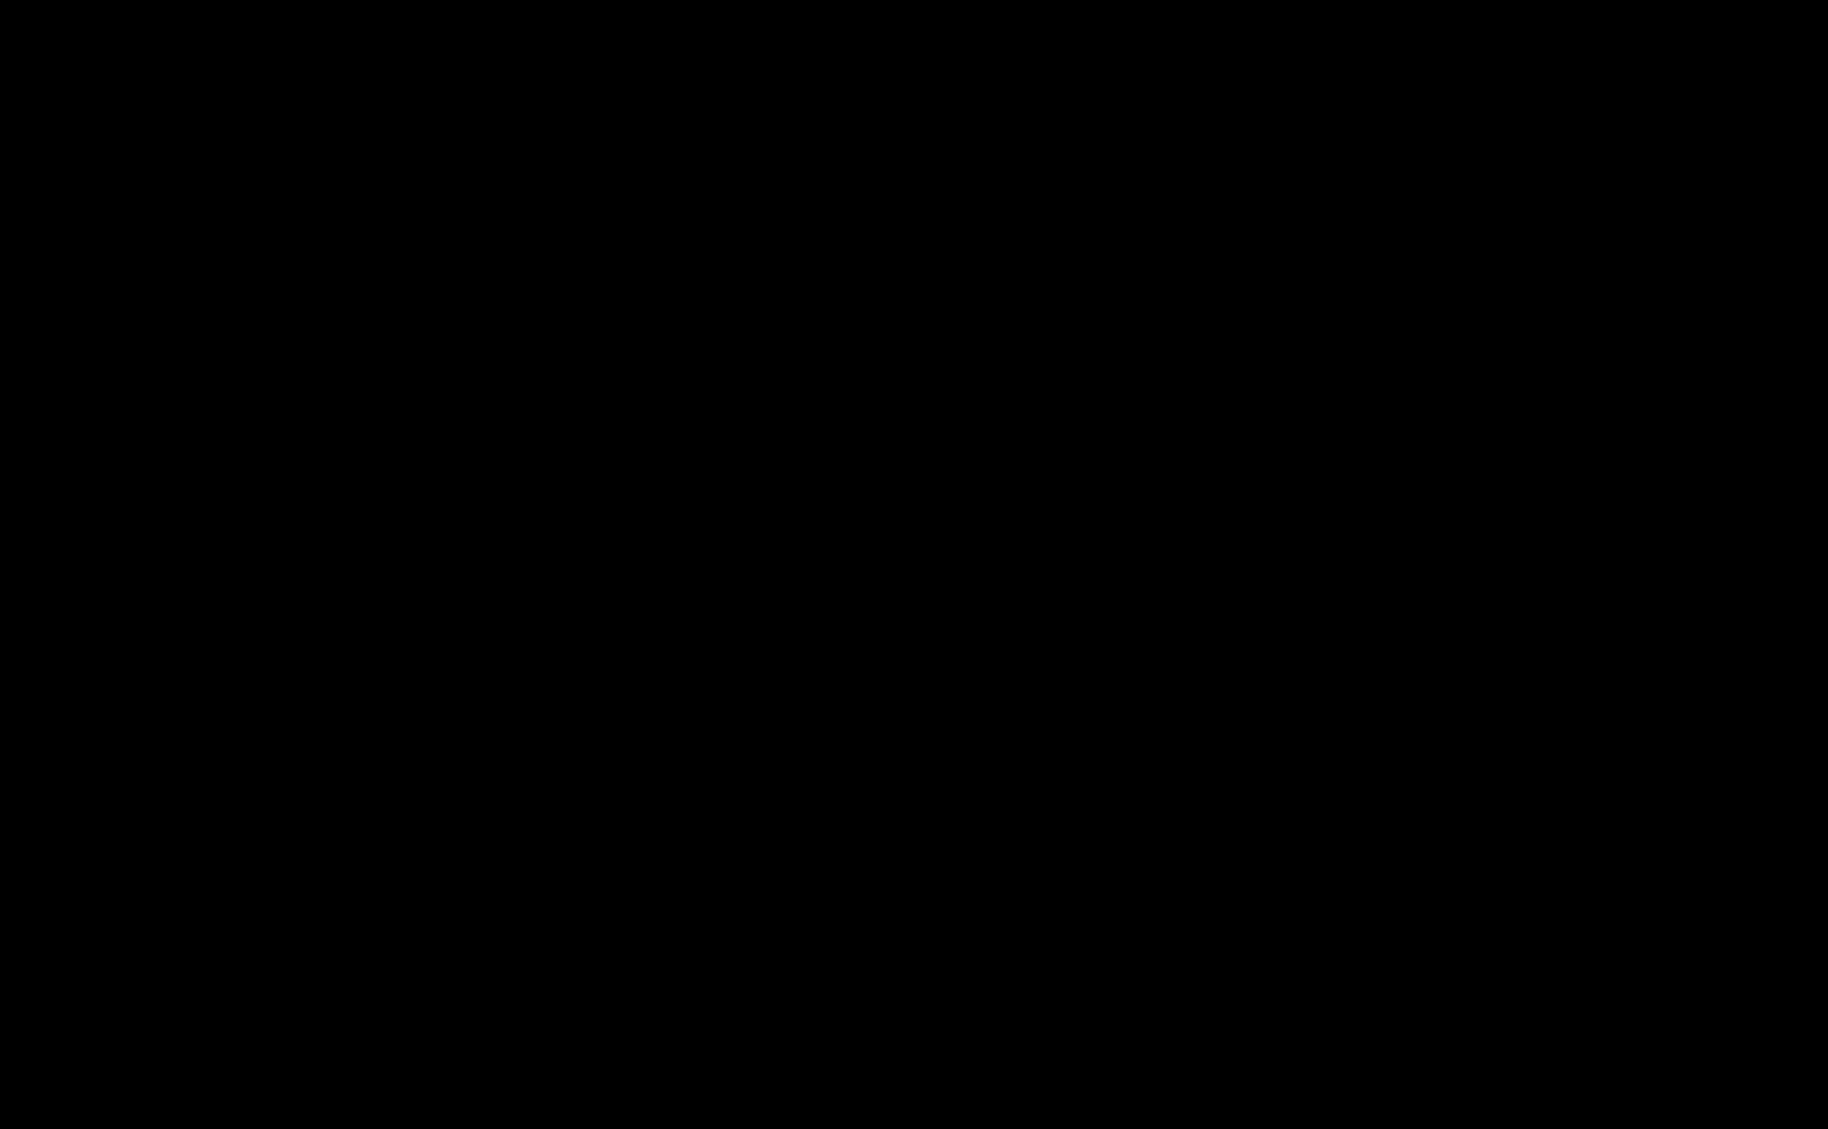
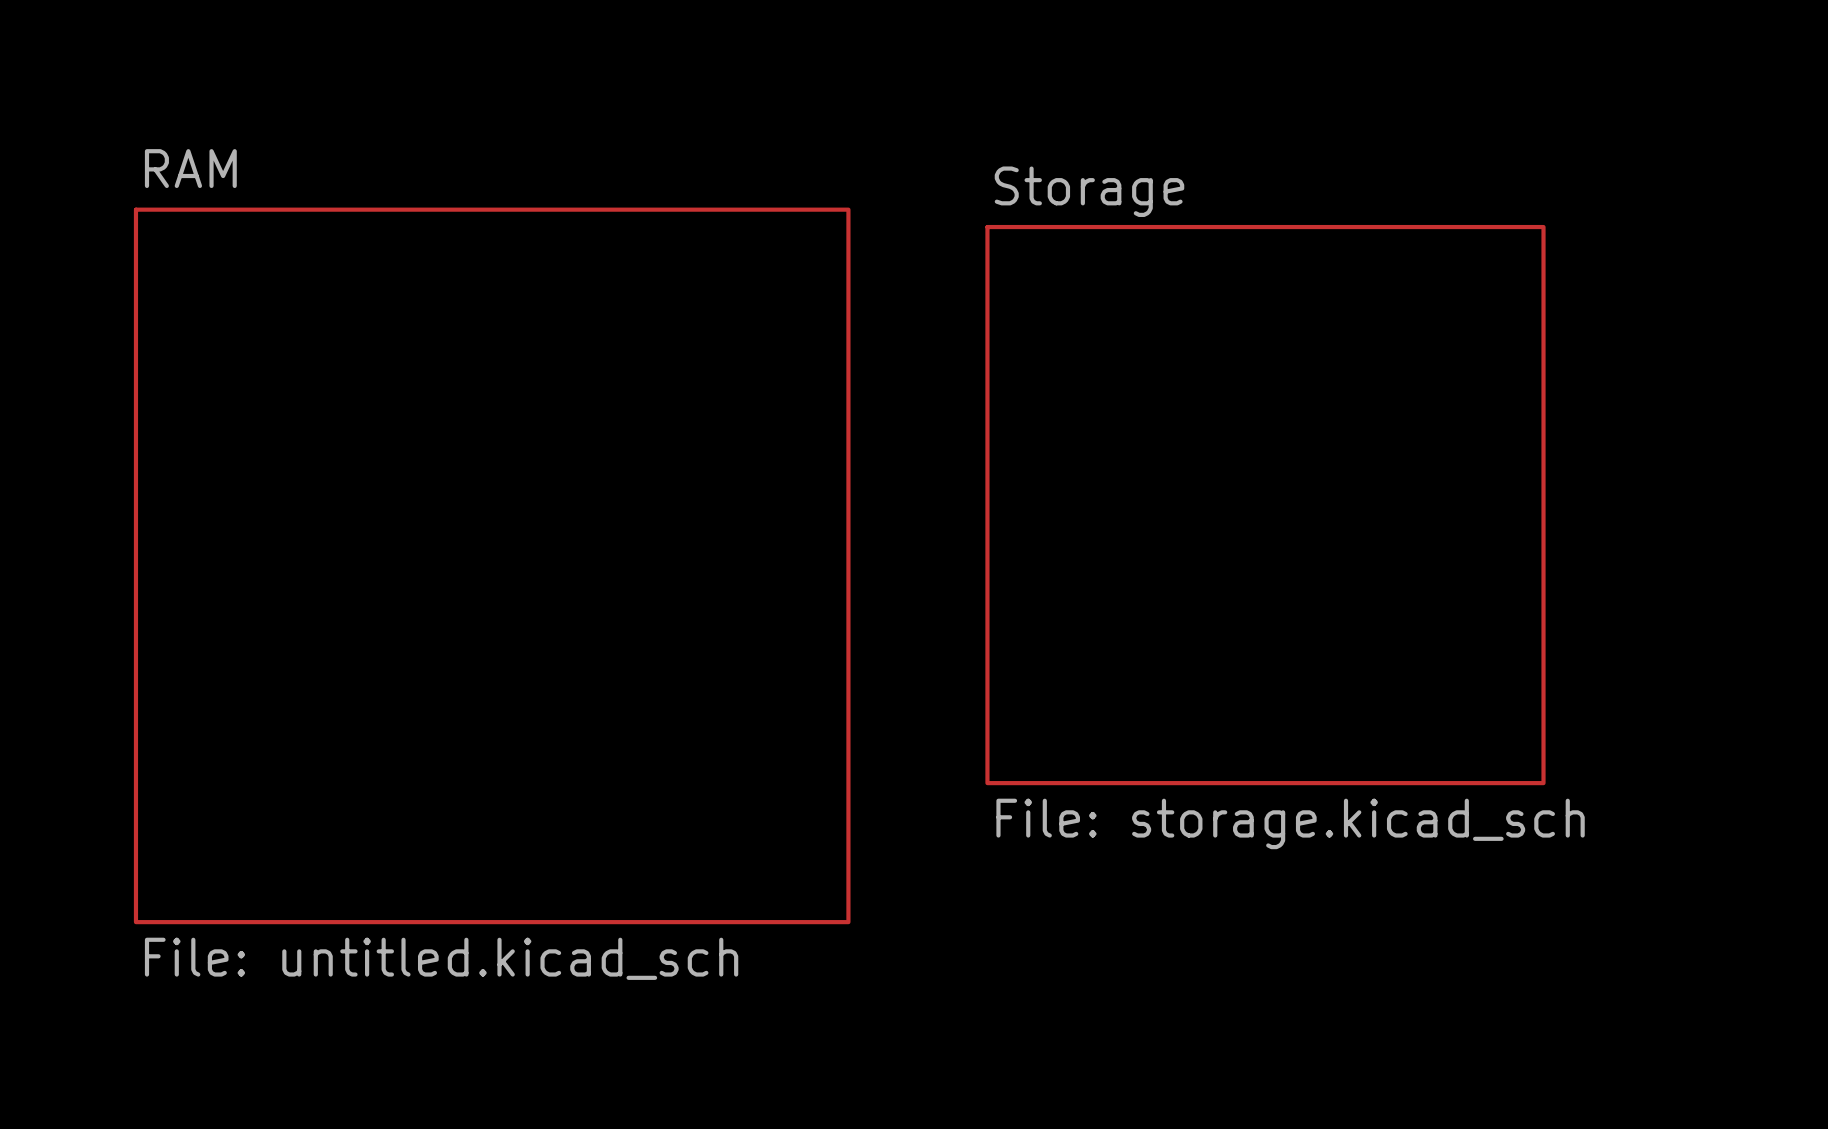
sheet Storage: none -> File: storage.kicad_sch (1265, 505)
sheet RAM: none -> File: untitled.kicad_sch (492, 565)

